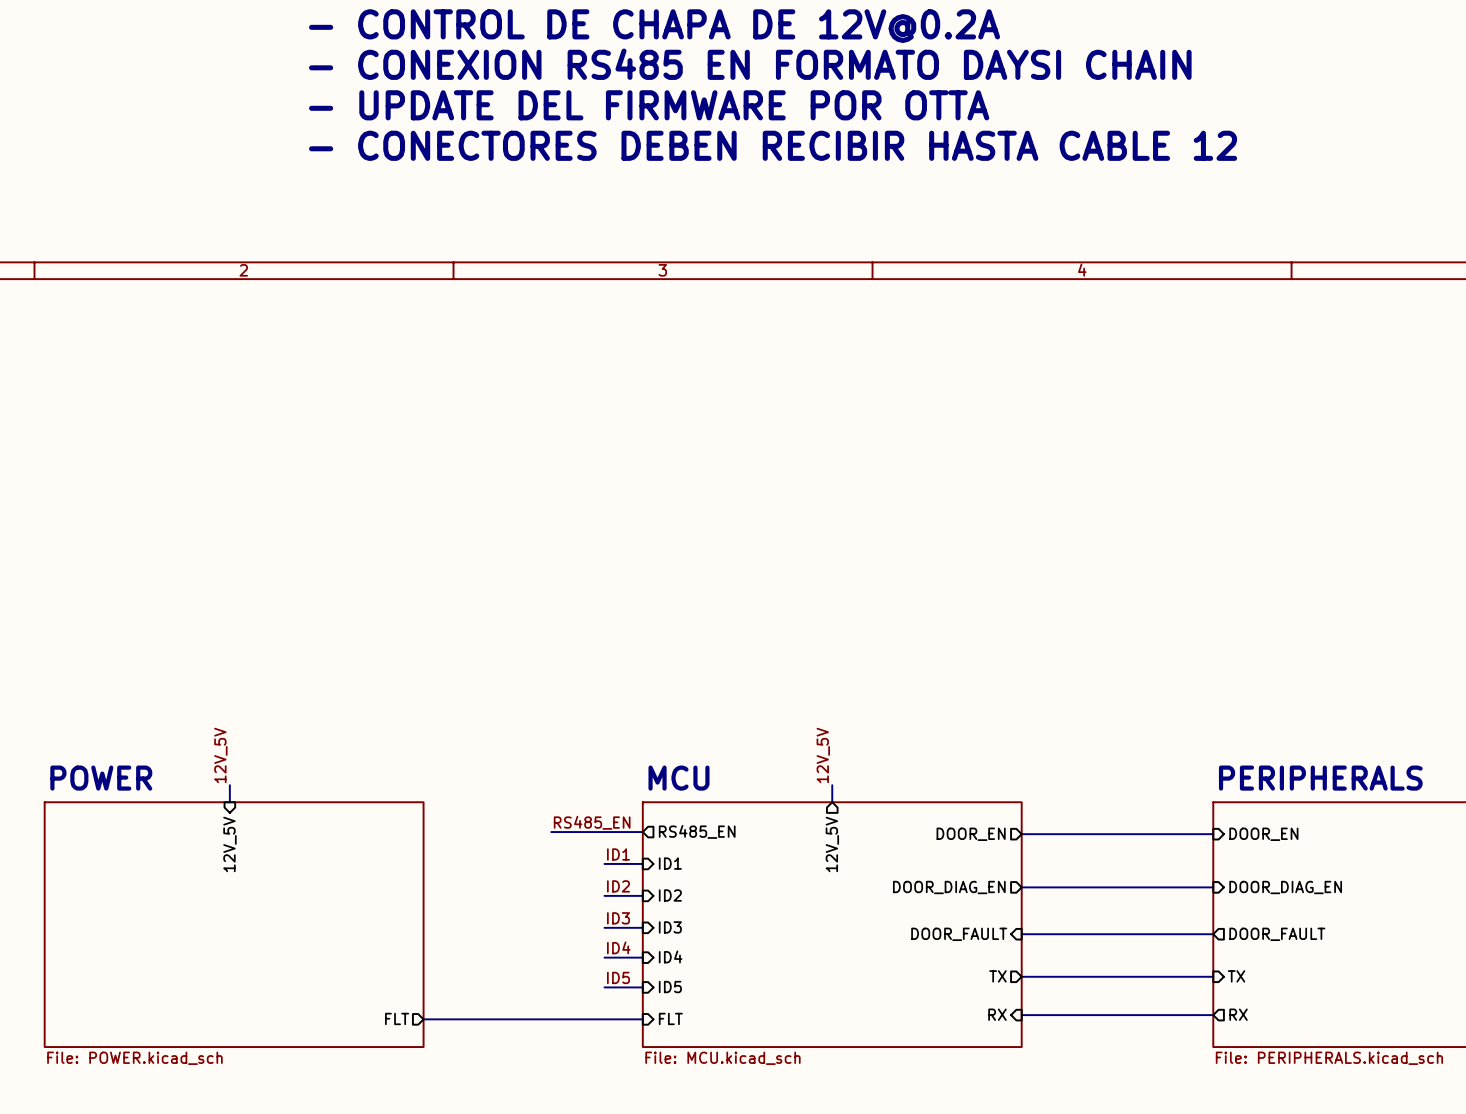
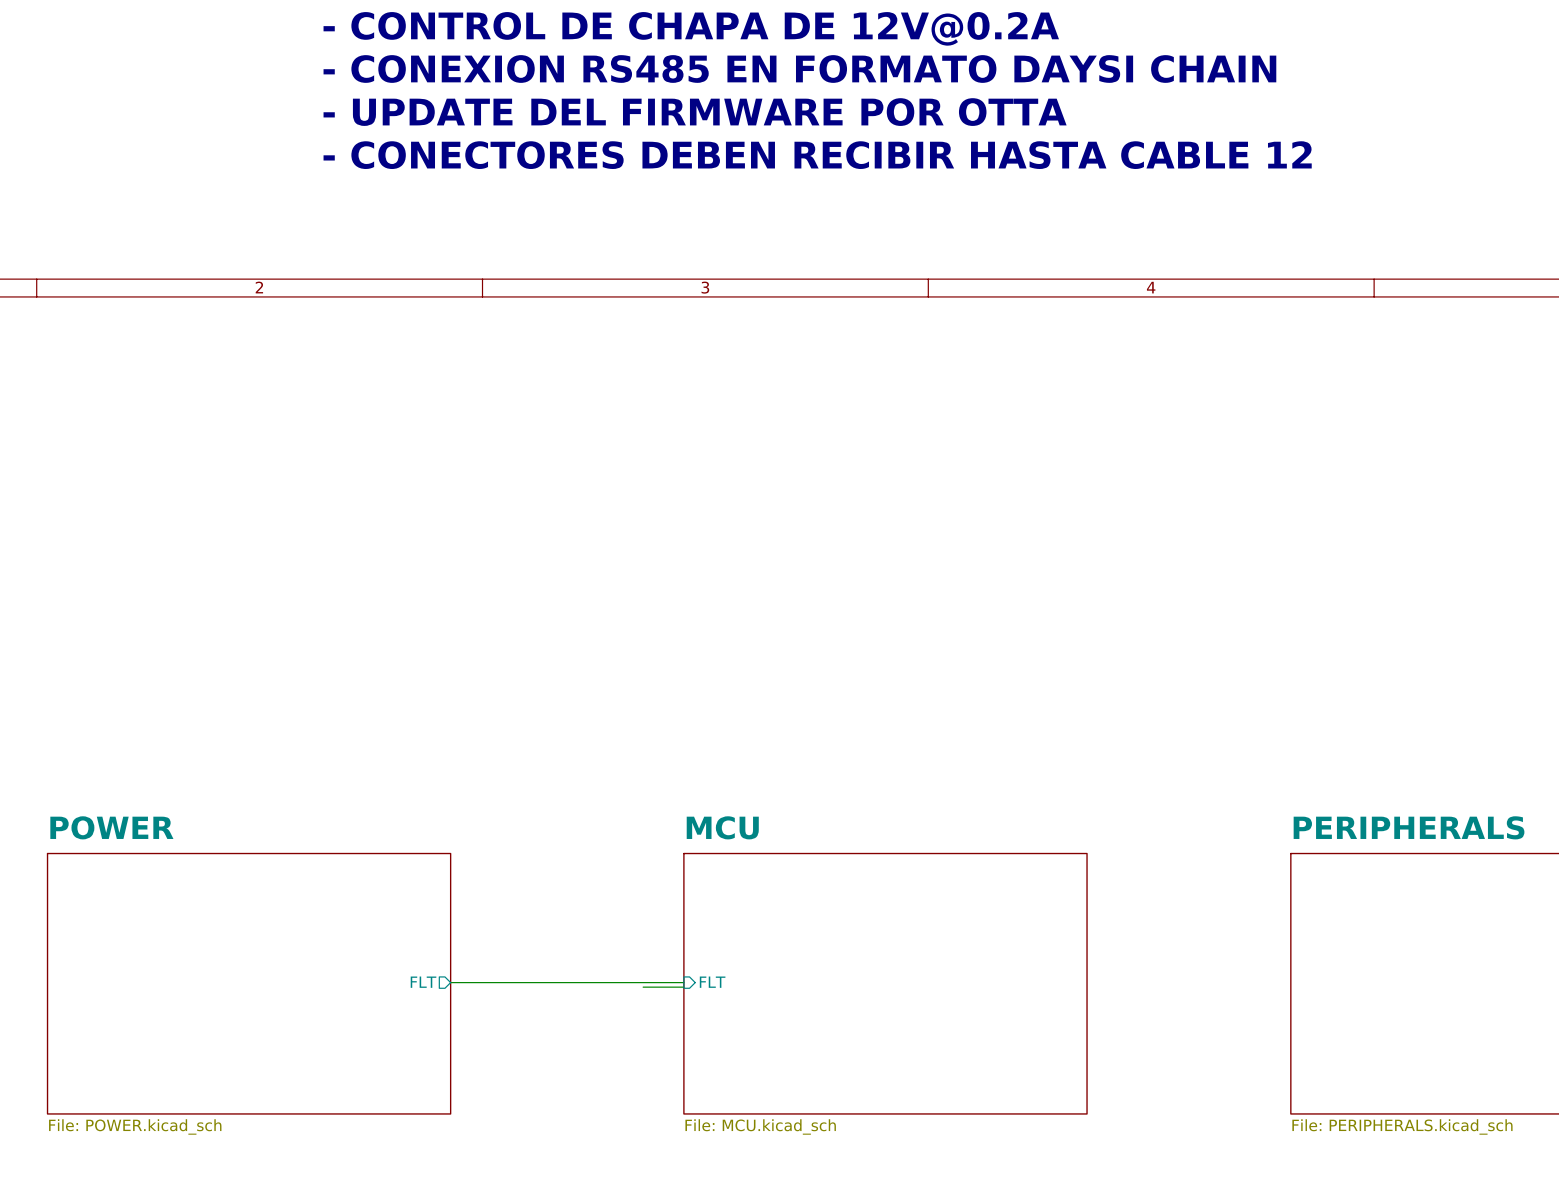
label: 12V_5V (220, 755) -> none
label: 12V_5V (823, 755) -> none
wire: (229, 785) (229, 802) -> none
wire: (832, 785) (832, 802) -> none
label: RS485_EN (592, 822) -> none
sheet pin: RS485_EN (697, 831) -> none
wire: (551, 832) (642, 832) -> none
sheet pin: DOOR_EN (971, 834) -> none
wire: (1021, 834) (1213, 834) -> none
sheet pin: DOOR_EN (1263, 834) -> none
sheet pin: 12V_5V (229, 844) -> none
sheet pin: 12V_5V (832, 844) -> none
label: ID1 (618, 854) -> none
wire: (604, 863) (642, 863) -> none
sheet pin: ID1 (670, 863) -> none
label: ID2 (618, 886) -> none
sheet pin: DOOR_DIAG_EN (949, 887) -> none
wire: (1021, 887) (1213, 887) -> none
sheet pin: DOOR_DIAG_EN (1285, 887) -> none
wire: (604, 895) (642, 895) -> none
sheet pin: ID2 (670, 895) -> none
label: ID3 (618, 918) -> none
sheet pin: ID3 (670, 927) -> none
sheet pin: DOOR_FAULT (959, 934) -> none
wire: (1021, 934) (1213, 934) -> none
sheet pin: DOOR_FAULT (1277, 934) -> none
label: ID4 (618, 947) -> none
sheet pin: ID4 (670, 956) -> none
wire: (604, 957) (642, 957) -> none
sheet pin: TX (997, 976) -> none
wire: (1021, 976) (1213, 976) -> none
sheet pin: TX (1236, 976) -> none
label: ID5 (618, 977) -> none
wire: (604, 987) (642, 987) -> none
sheet pin: ID5 (670, 987) -> none
sheet pin: RX (997, 1014) -> none
sheet pin: RX (1238, 1014) -> none
wire: (1021, 1015) (1213, 1015) -> none
sheet pin position: FLT (397, 1018) -> FLT (423, 982)
sheet pin position: FLT (670, 1018) -> FLT (712, 982)
wire: (423, 1019) (642, 1019) -> (450, 982) (683, 982)

